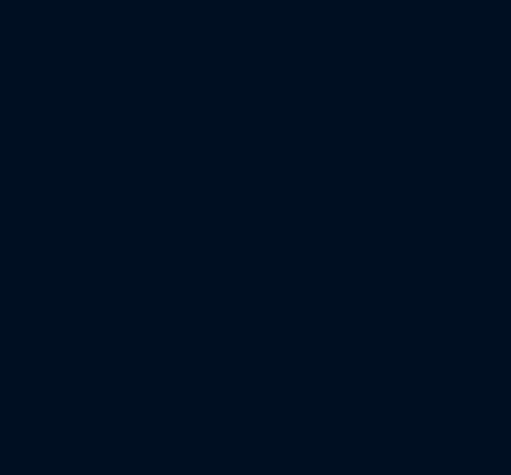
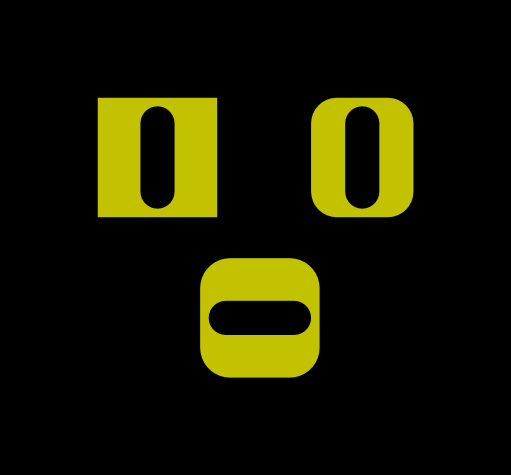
part: none -> (255, 237)

